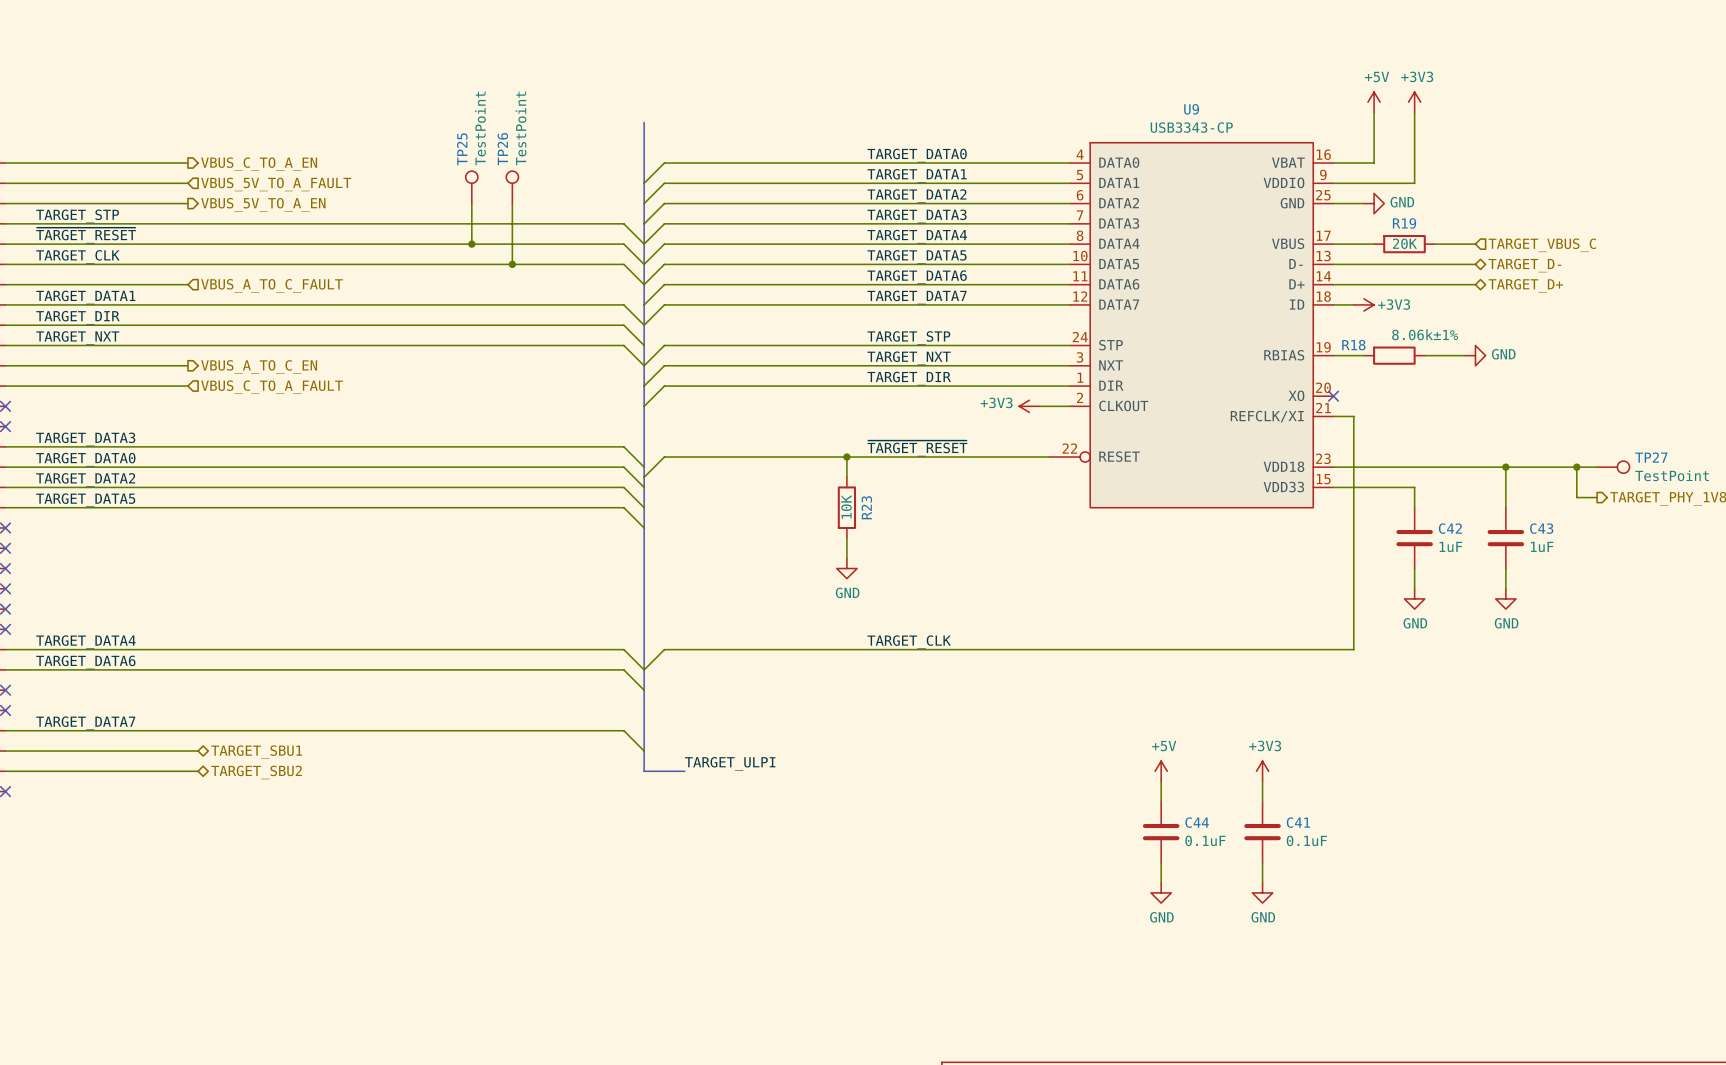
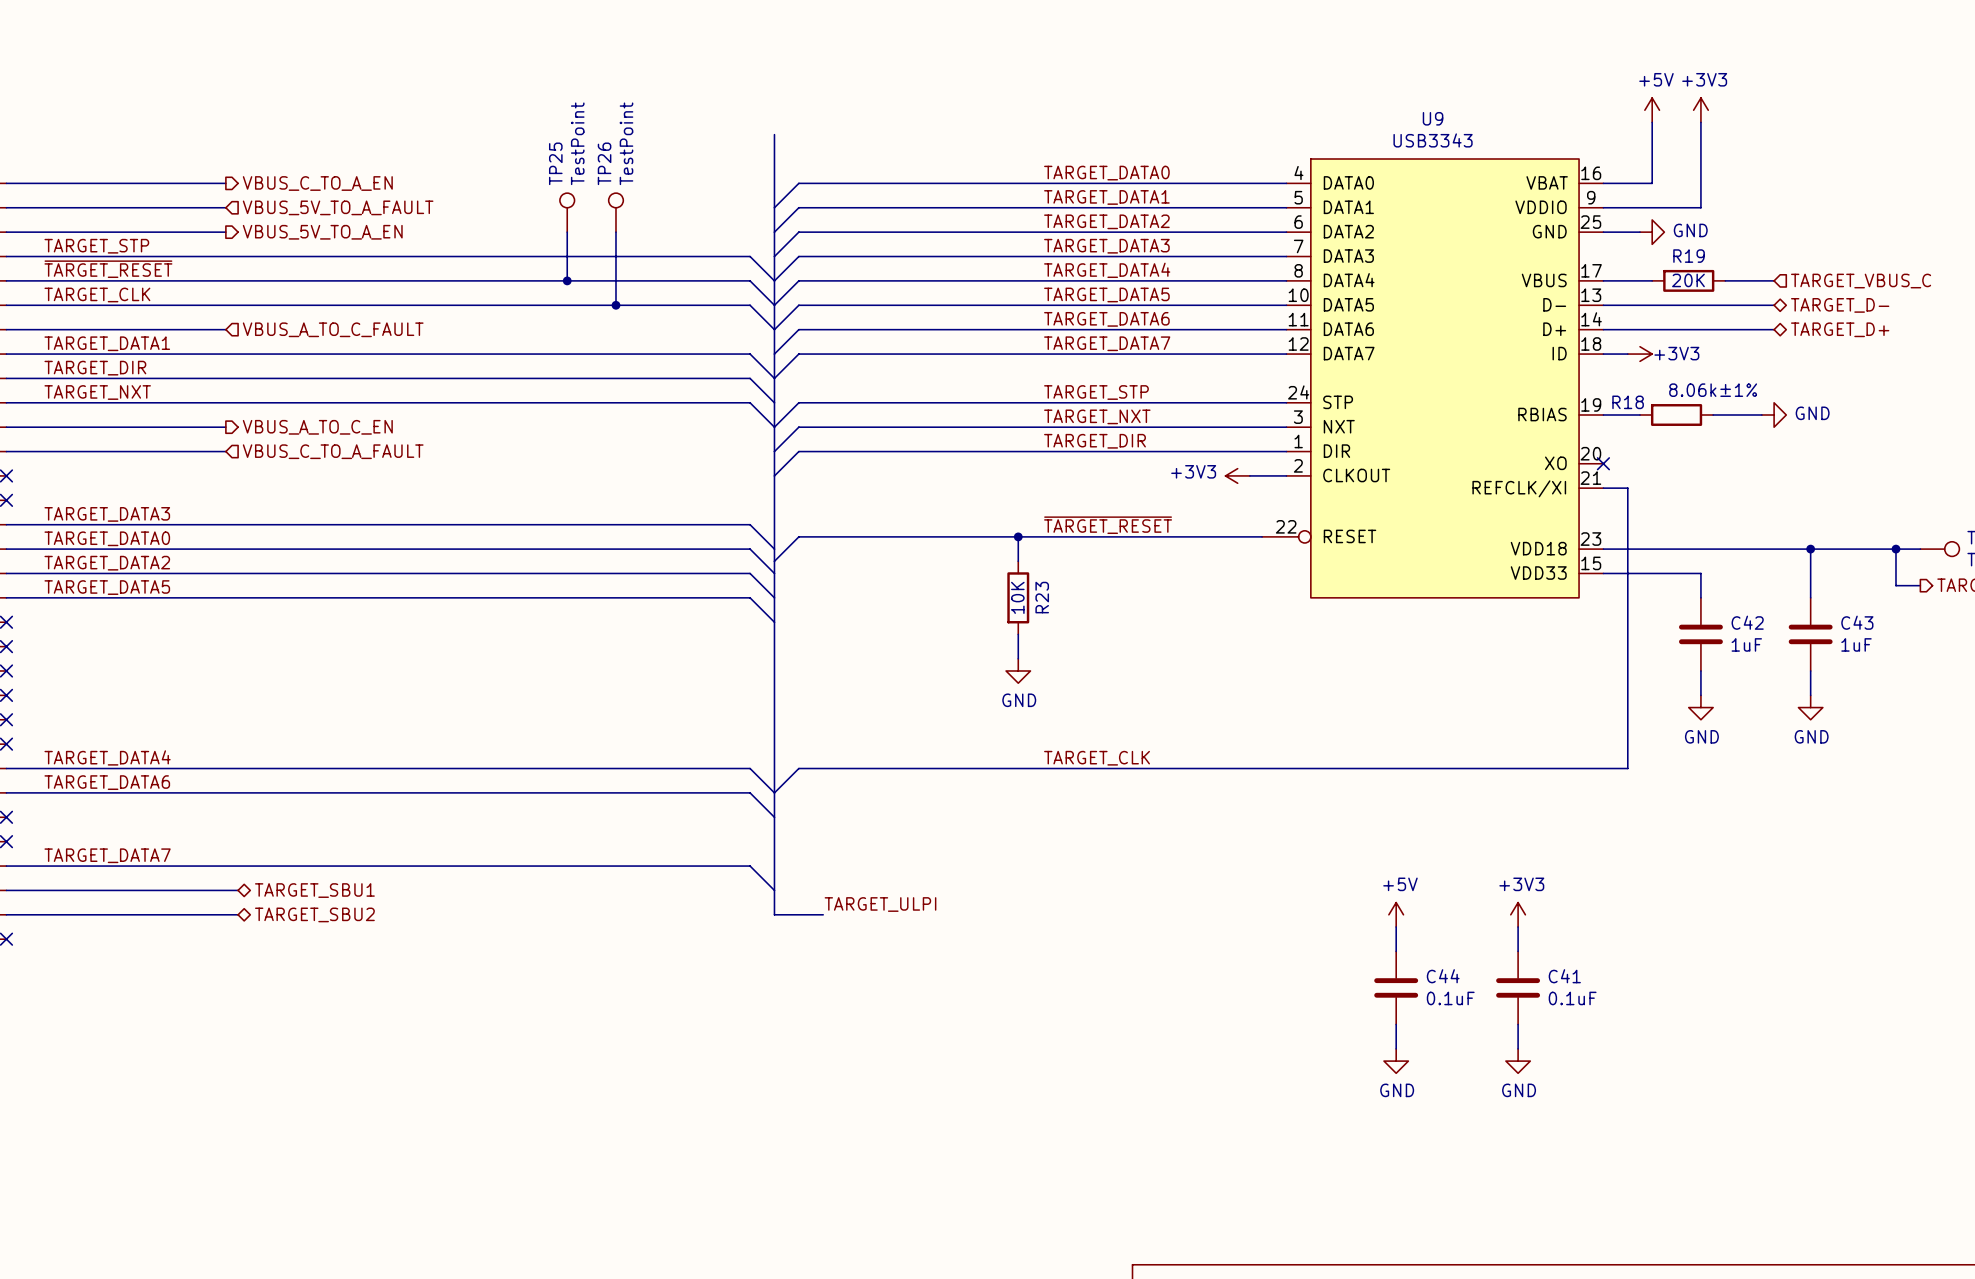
U9 value: USB3343-CP (1191, 127) -> USB3343 (1433, 140)

